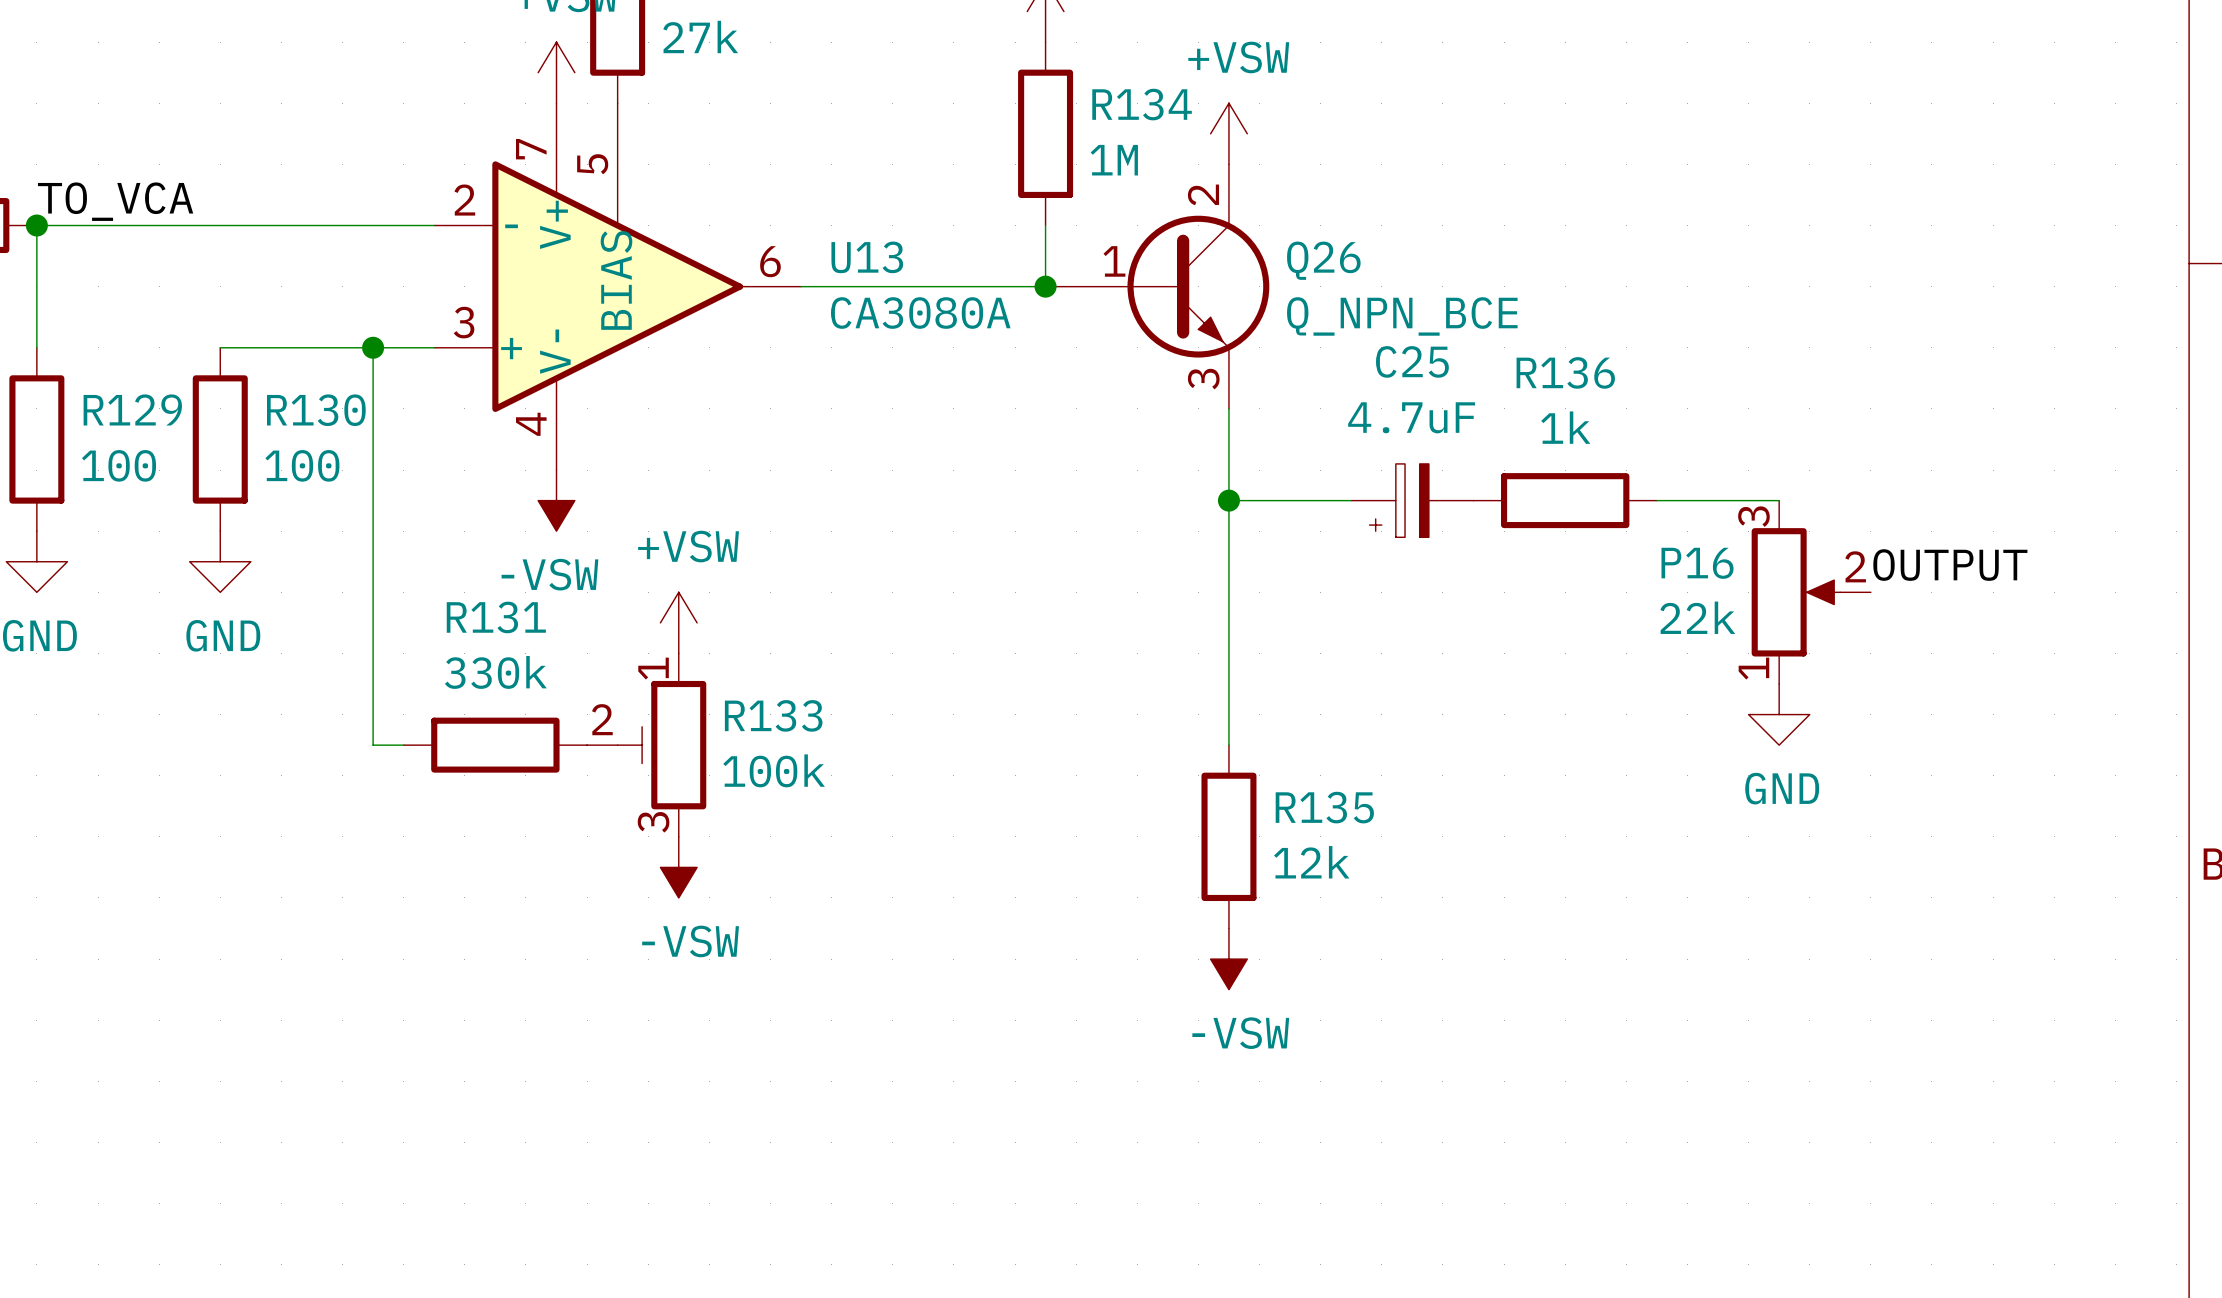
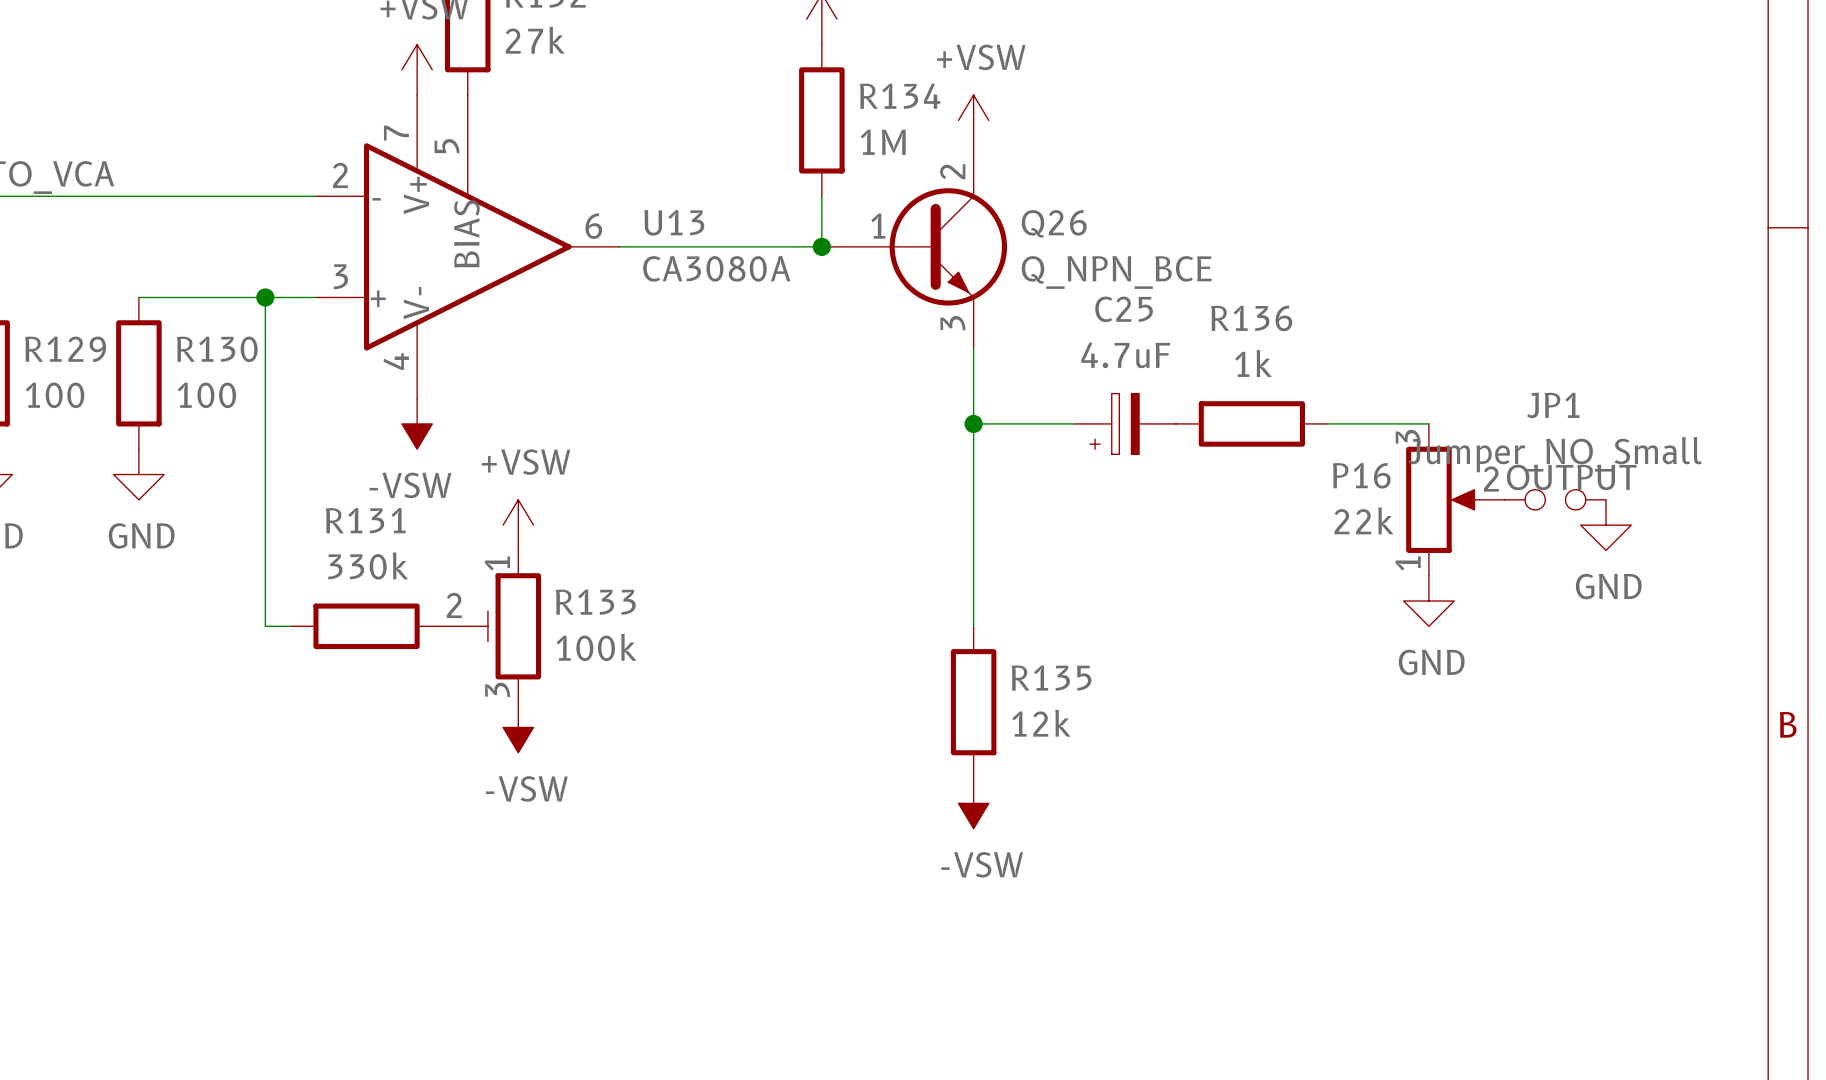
JP1: none -> Jumper_NO_Small (1555, 499)
power symbol: none -> GND (1606, 525)

